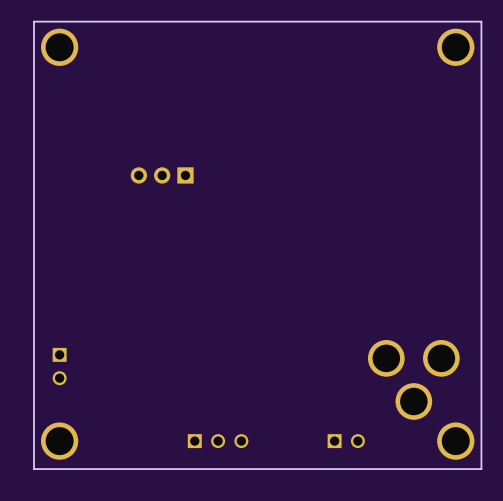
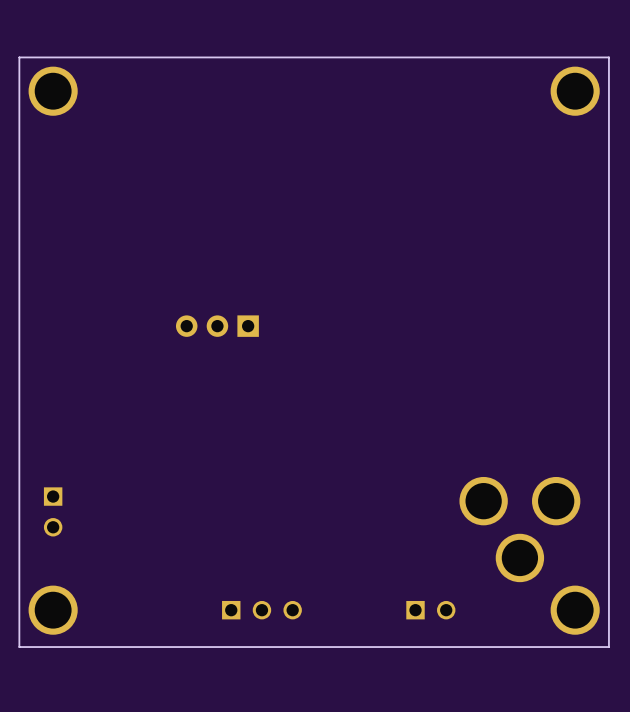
part position: (162, 175) -> (217, 326)

